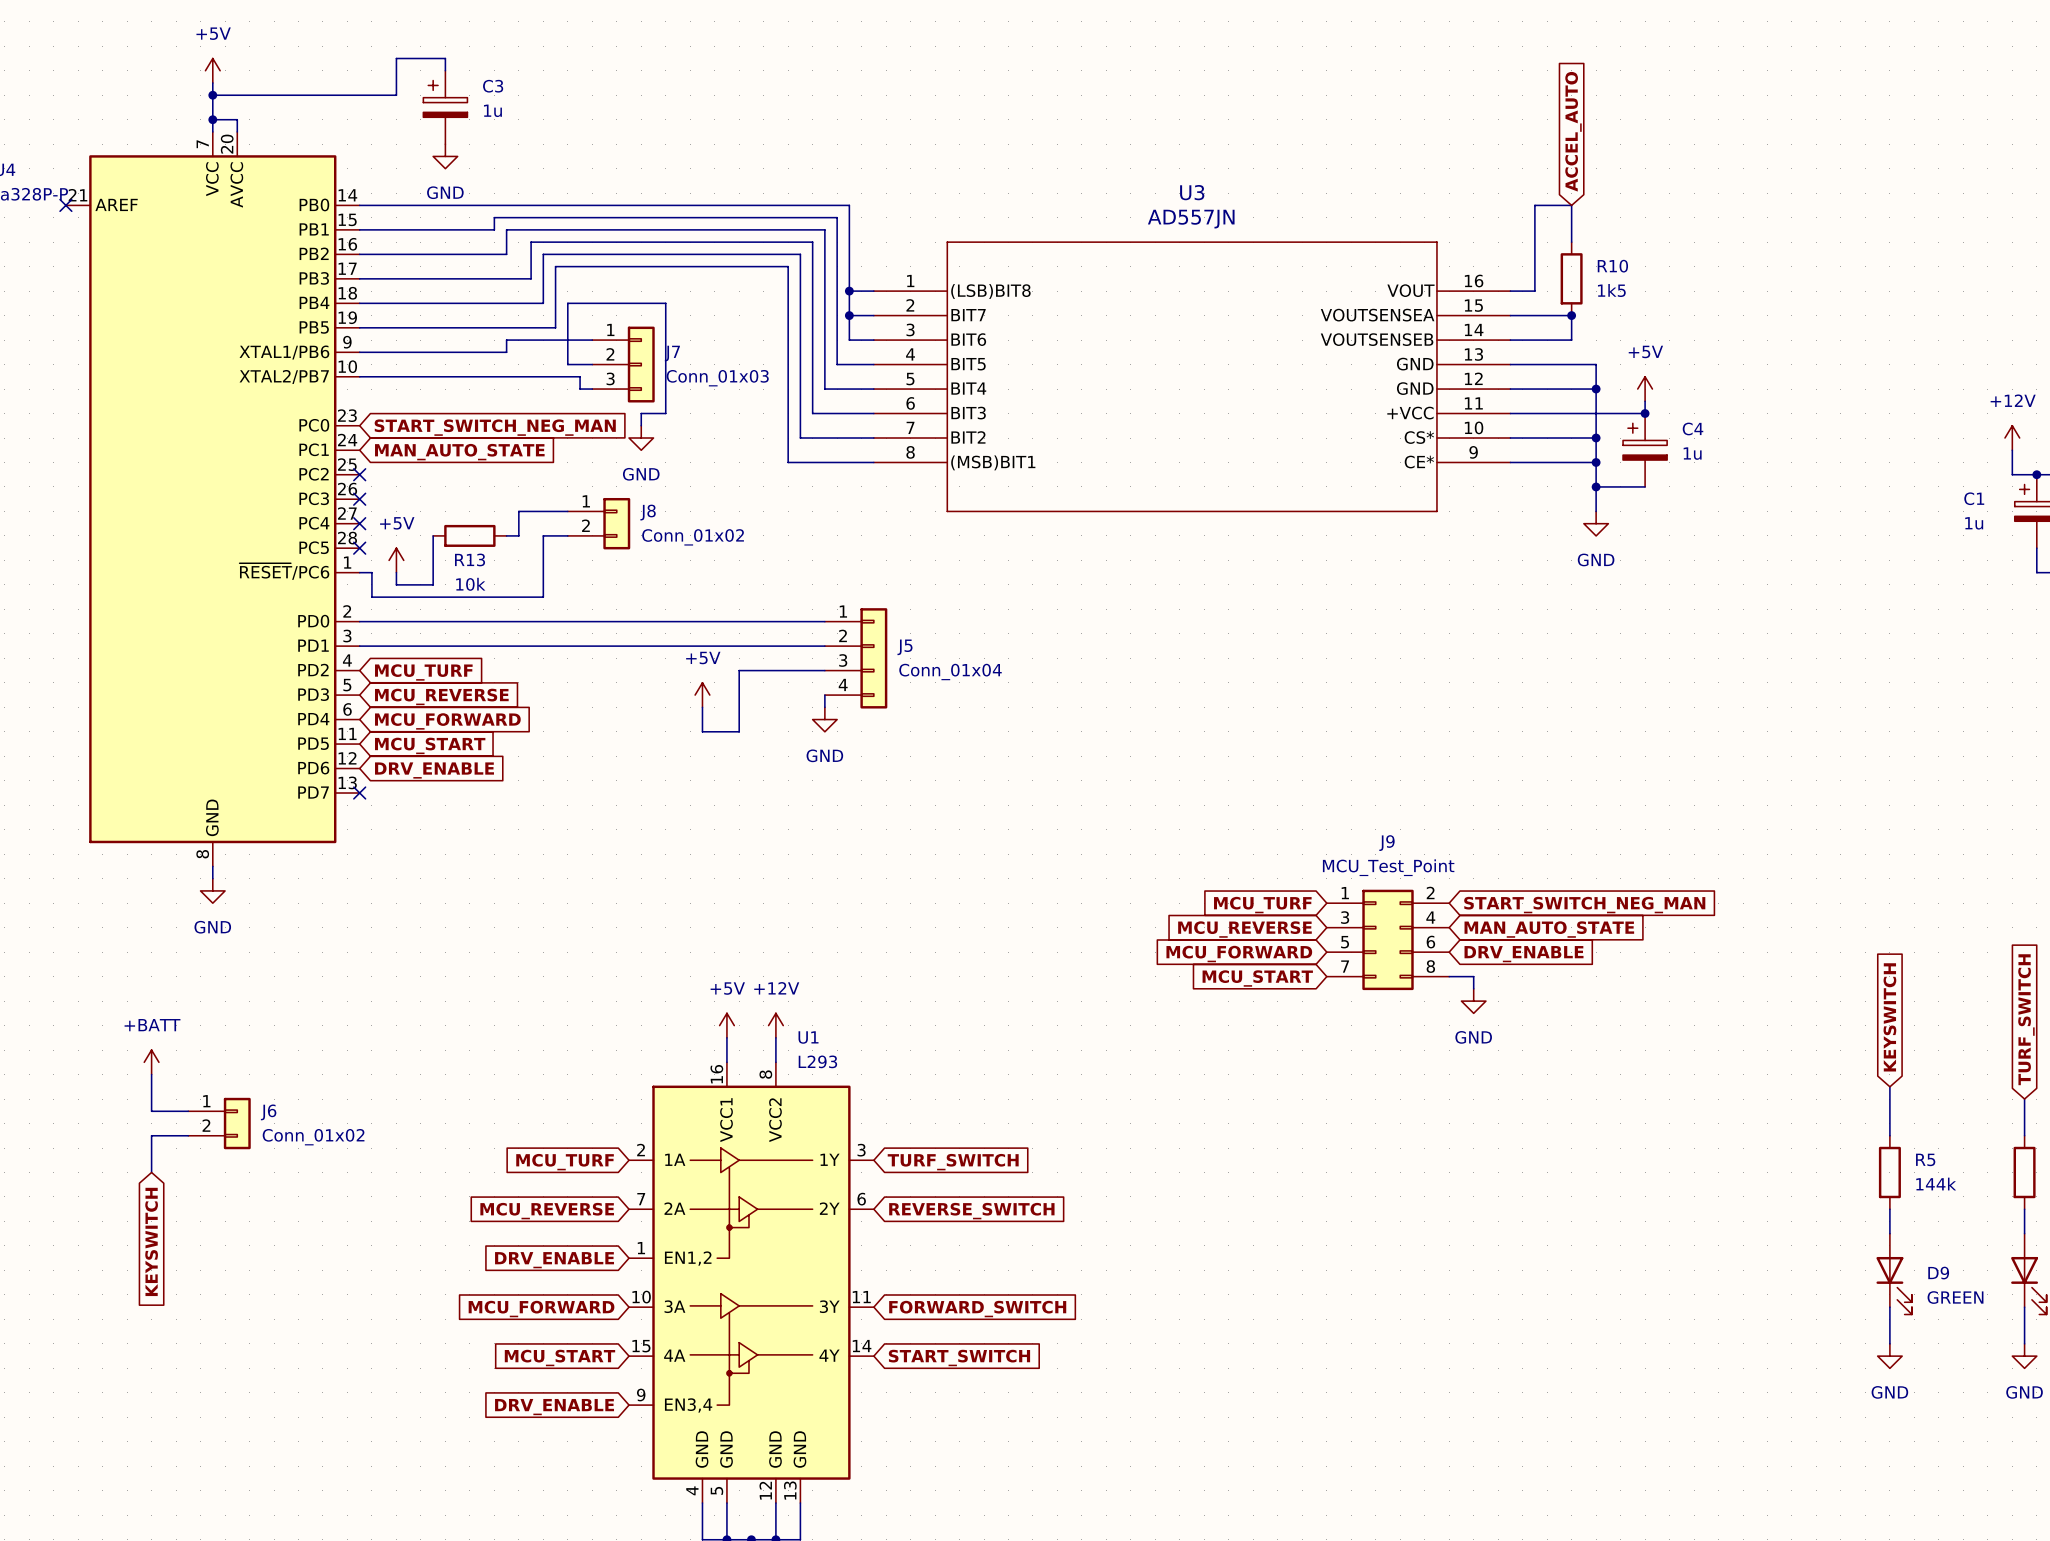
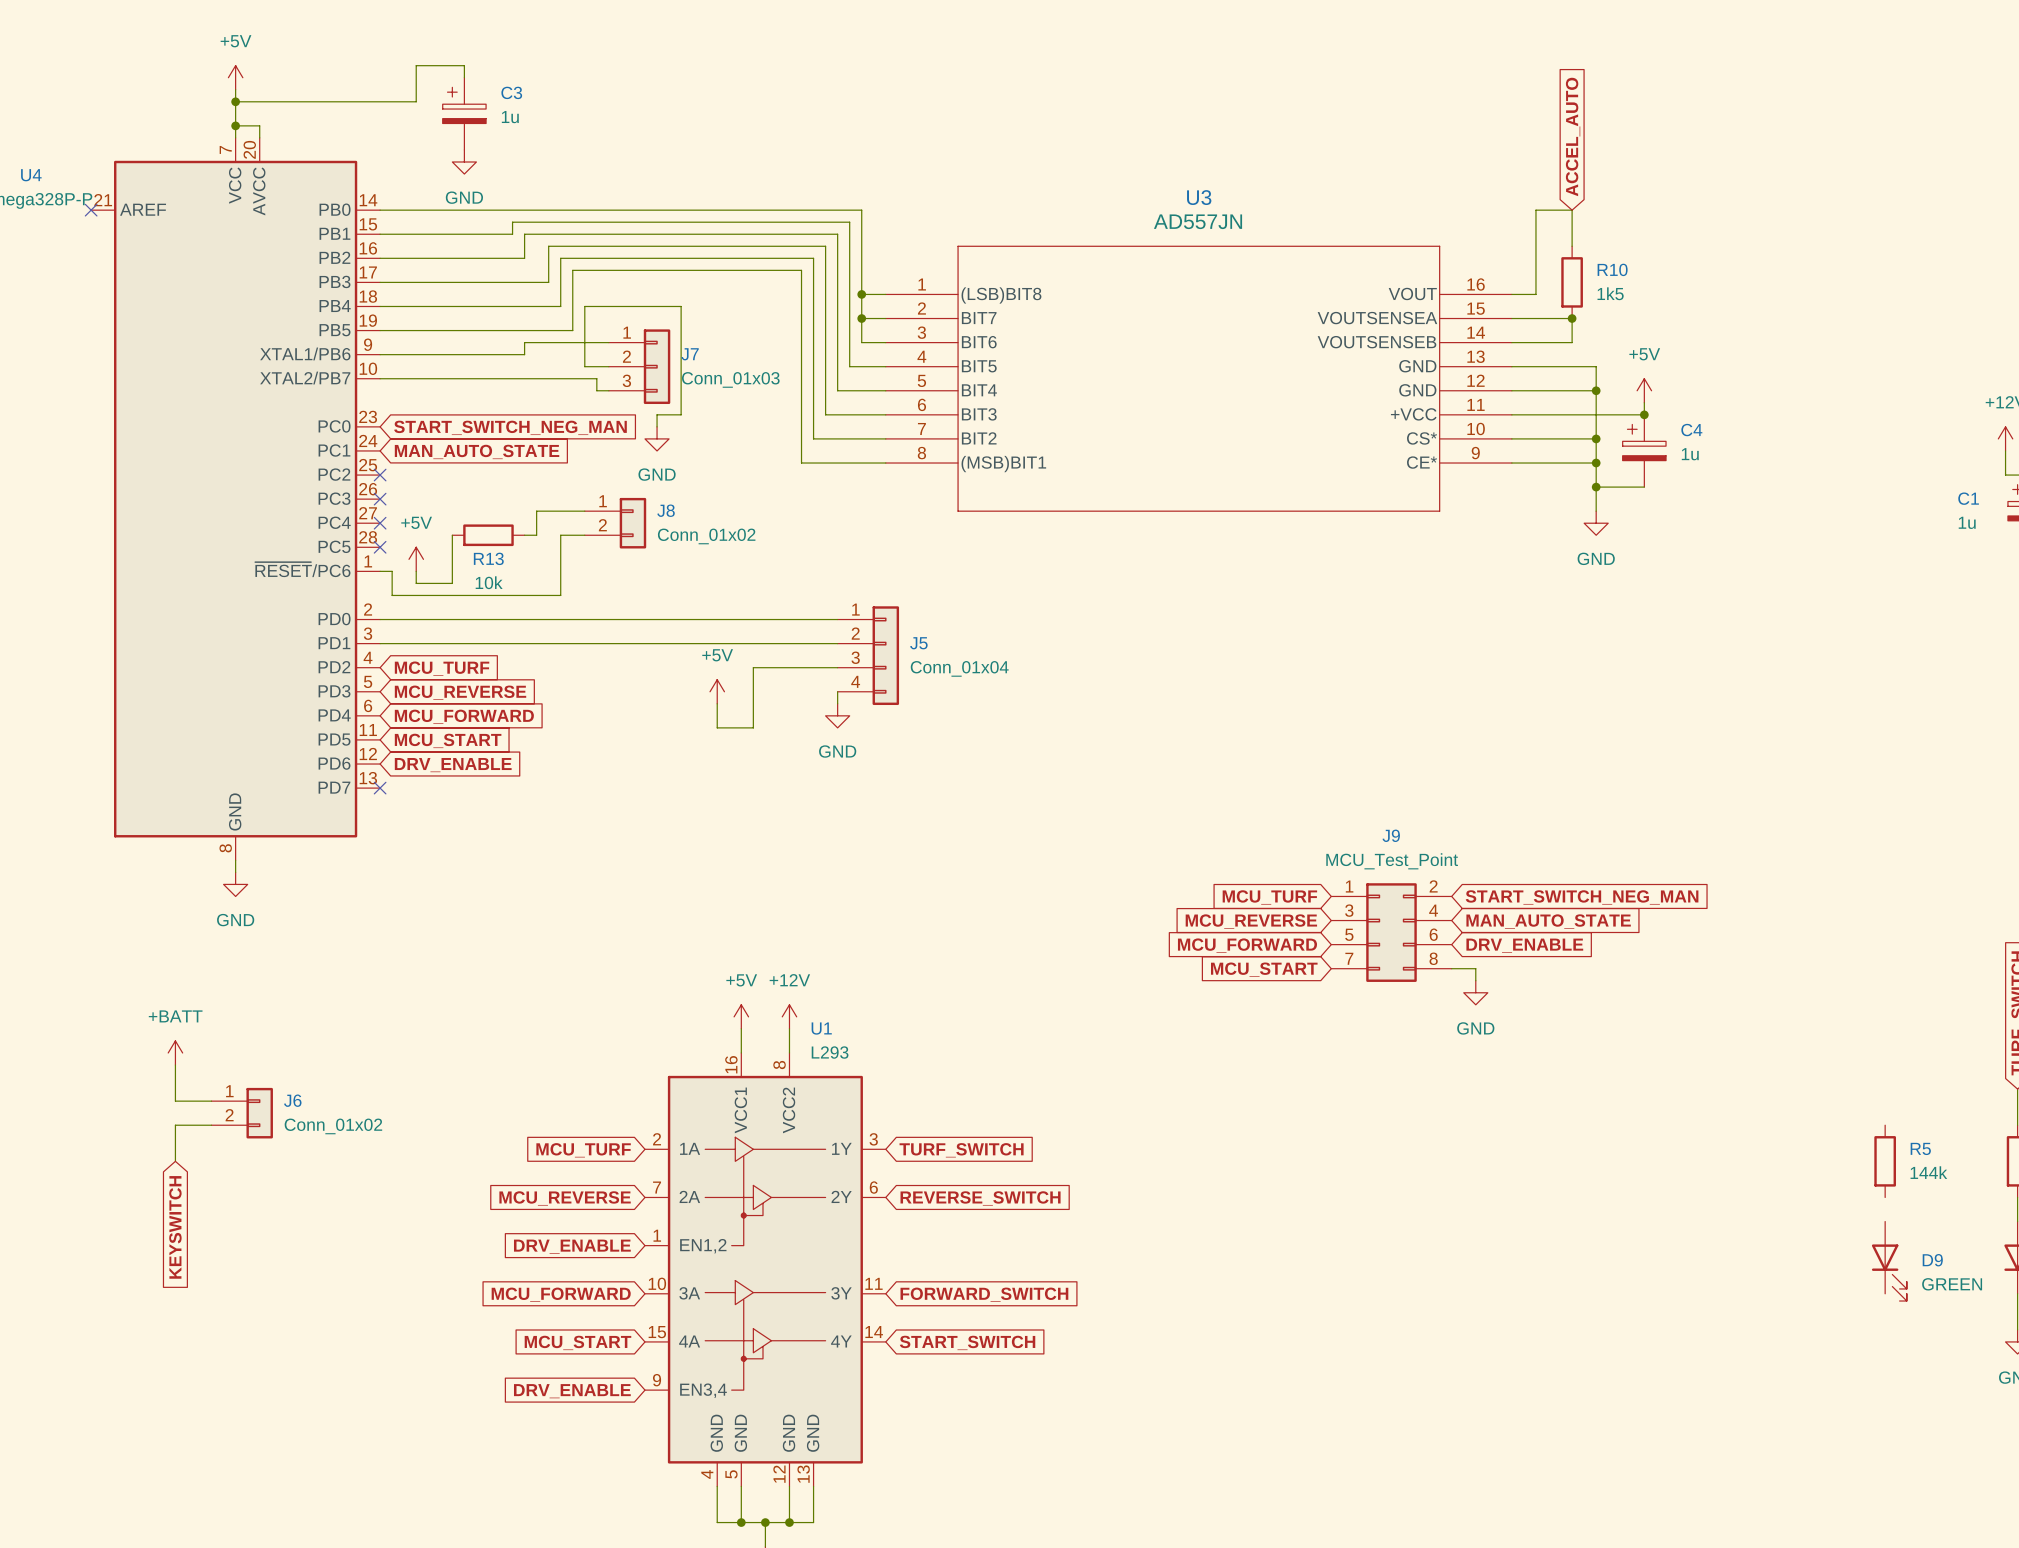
global label: KEYSWITCH (1889, 1017) -> none
wire: (1889, 1086) (1889, 1135) -> none
wire: (1889, 1209) (1889, 1233) -> none
wire: (1889, 1307) (1889, 1343) -> none
power symbol: GND (1889, 1356) -> none

